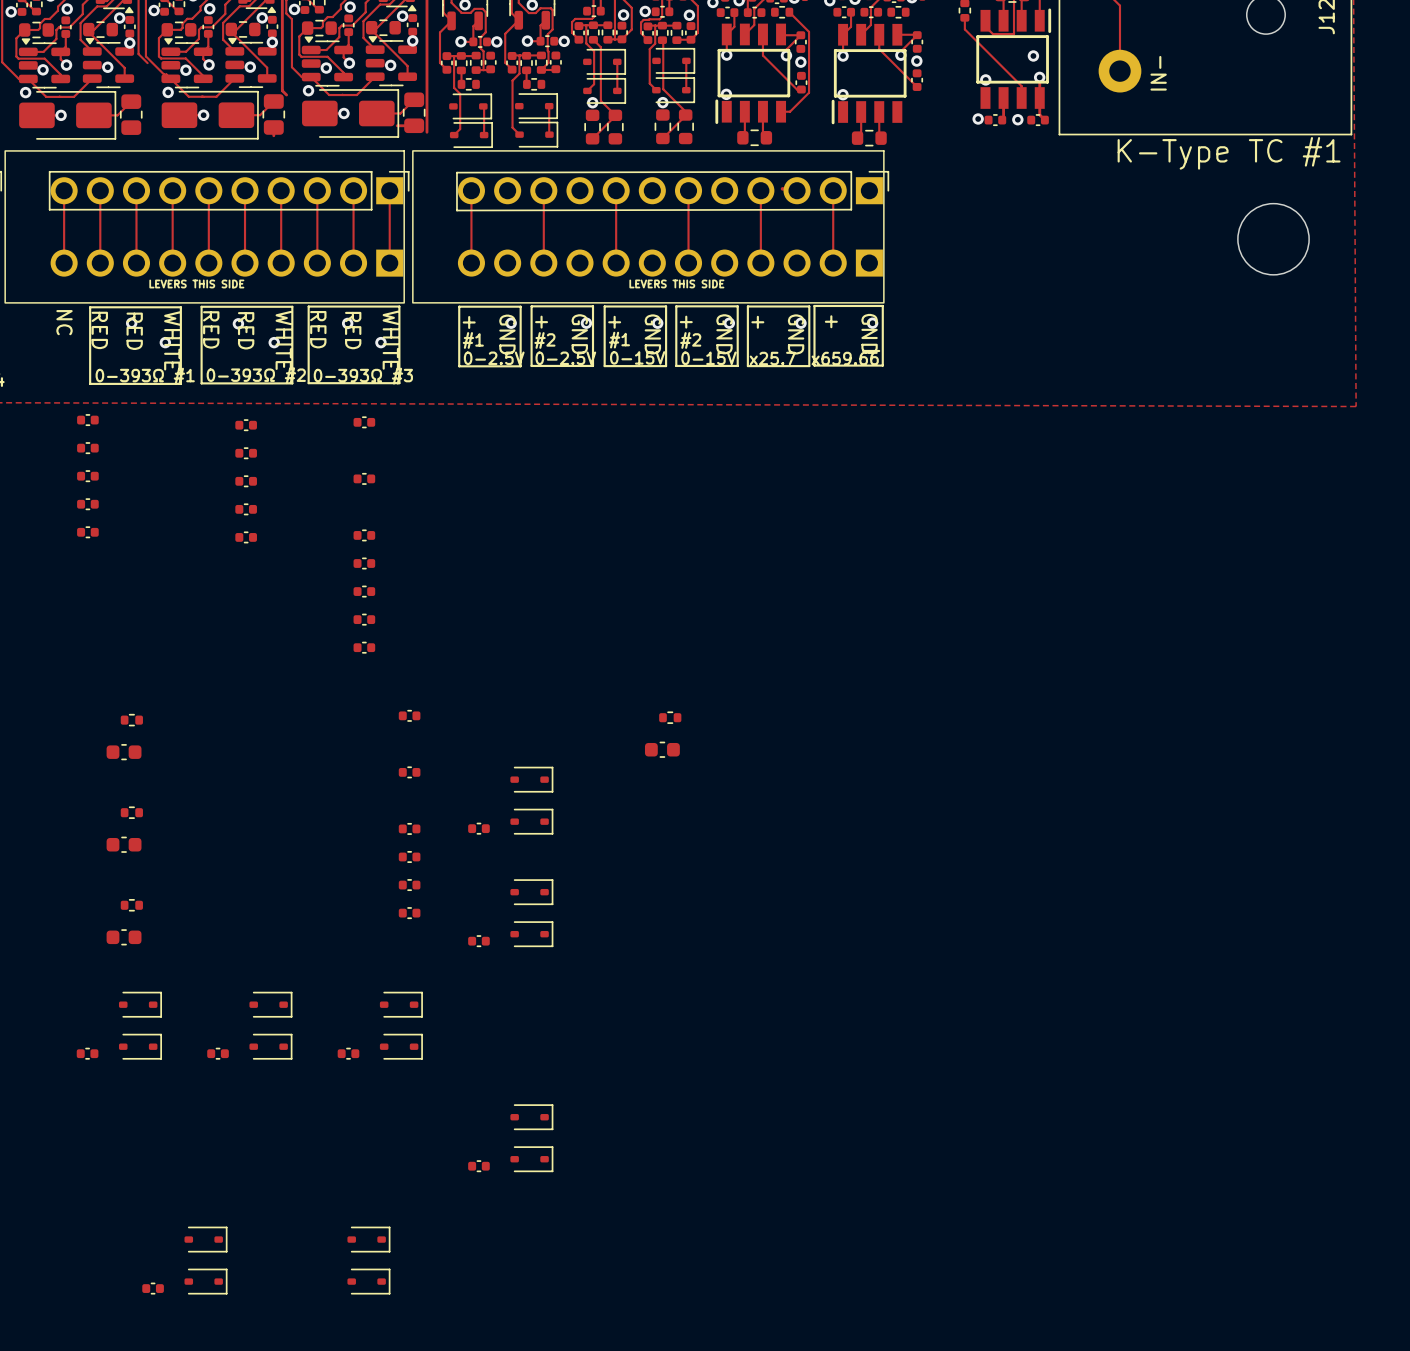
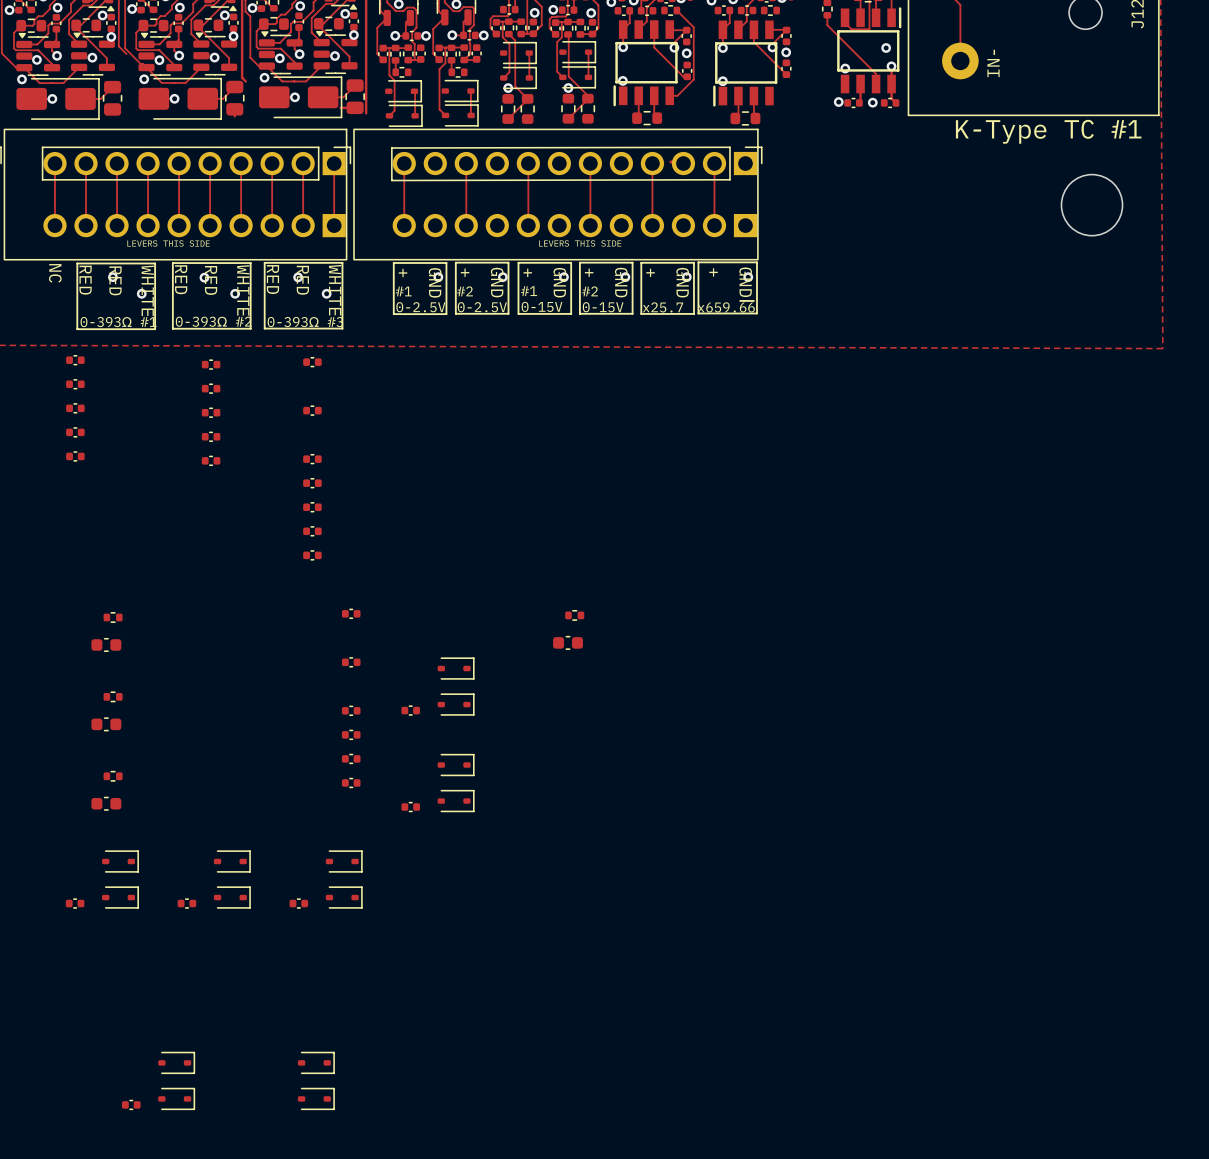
part: (531, 1117) -> none
part: (531, 1159) -> none
part: (478, 1166) -> none

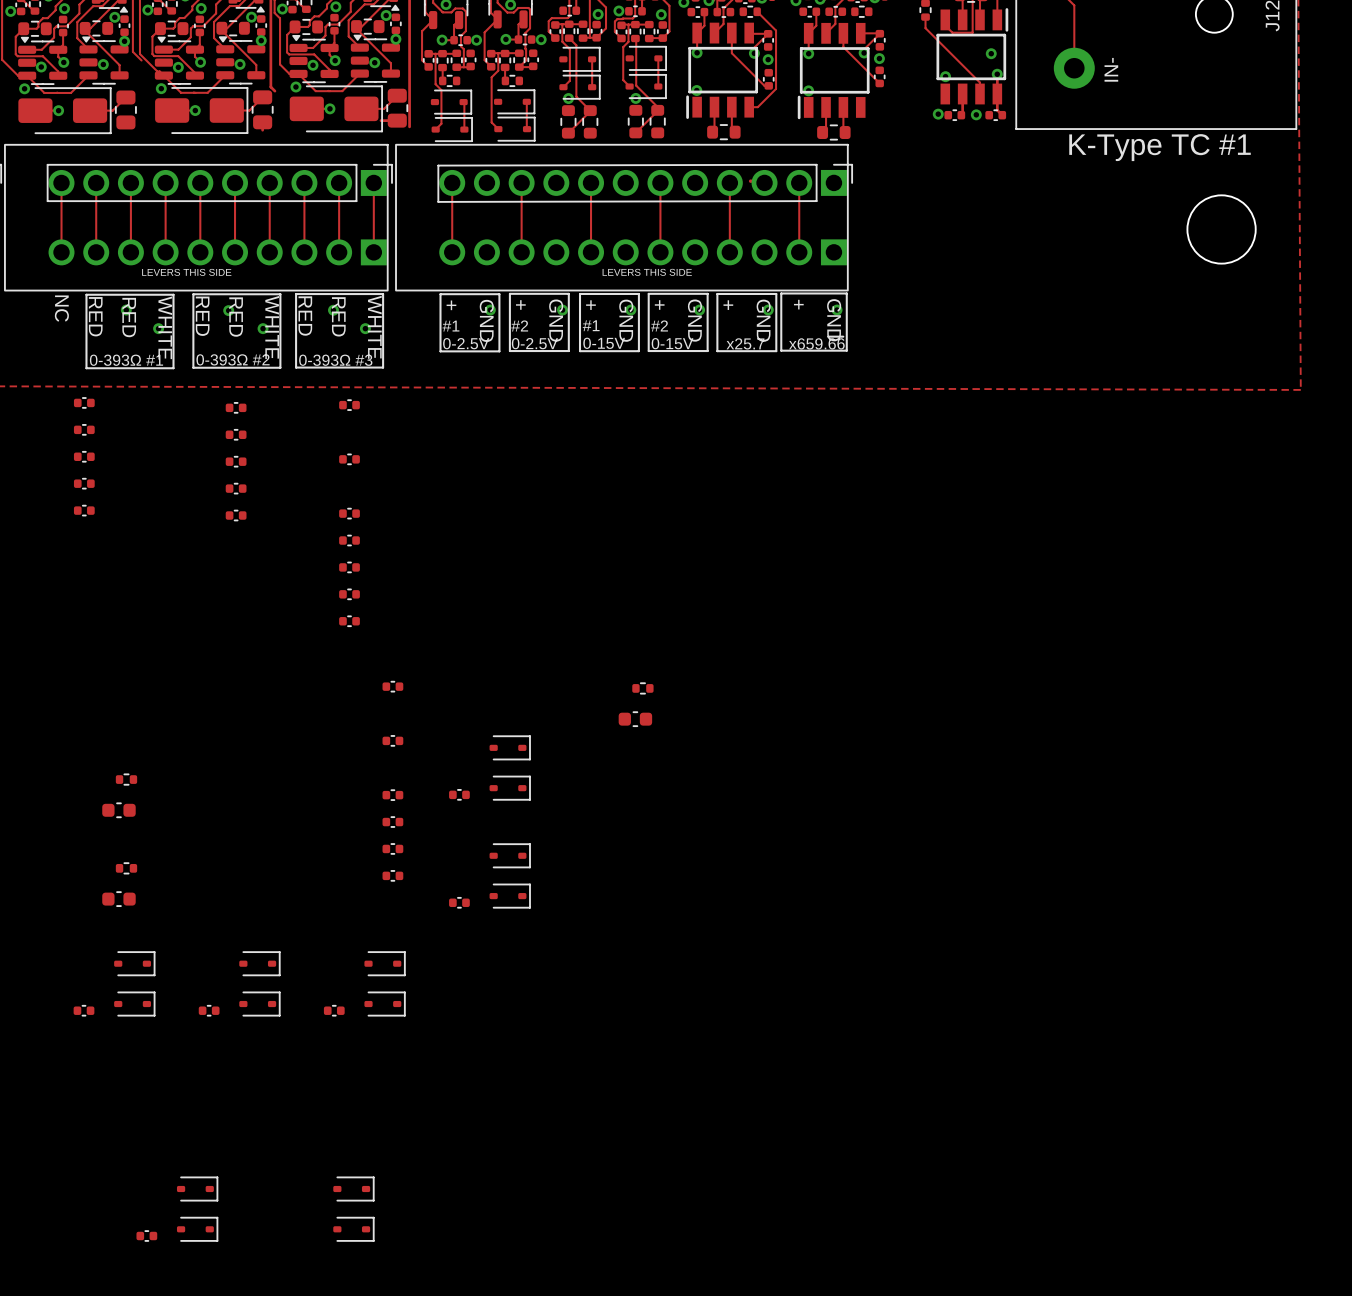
part: (113, 617) -> none
part: (106, 644) -> none

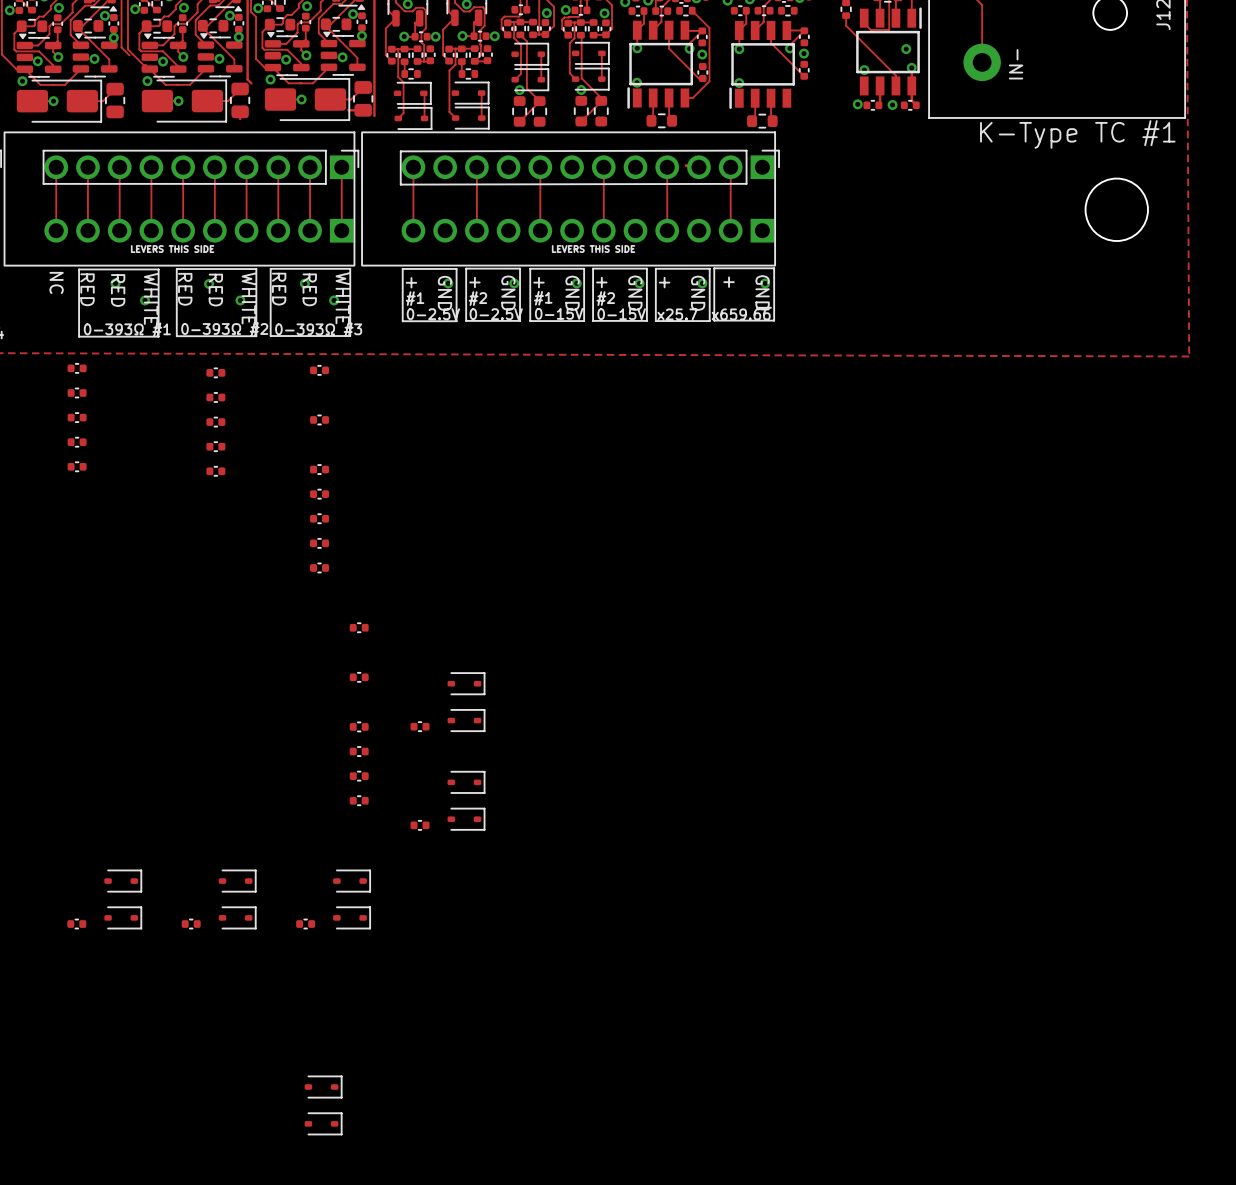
part: (642, 688) -> none
part: (635, 719) -> none
part: (126, 779) -> none
part: (118, 810) -> none
part: (126, 868) -> none
part: (118, 899) -> none
part: (197, 1189) -> none
part: (197, 1229) -> none
part: (146, 1236) -> none

